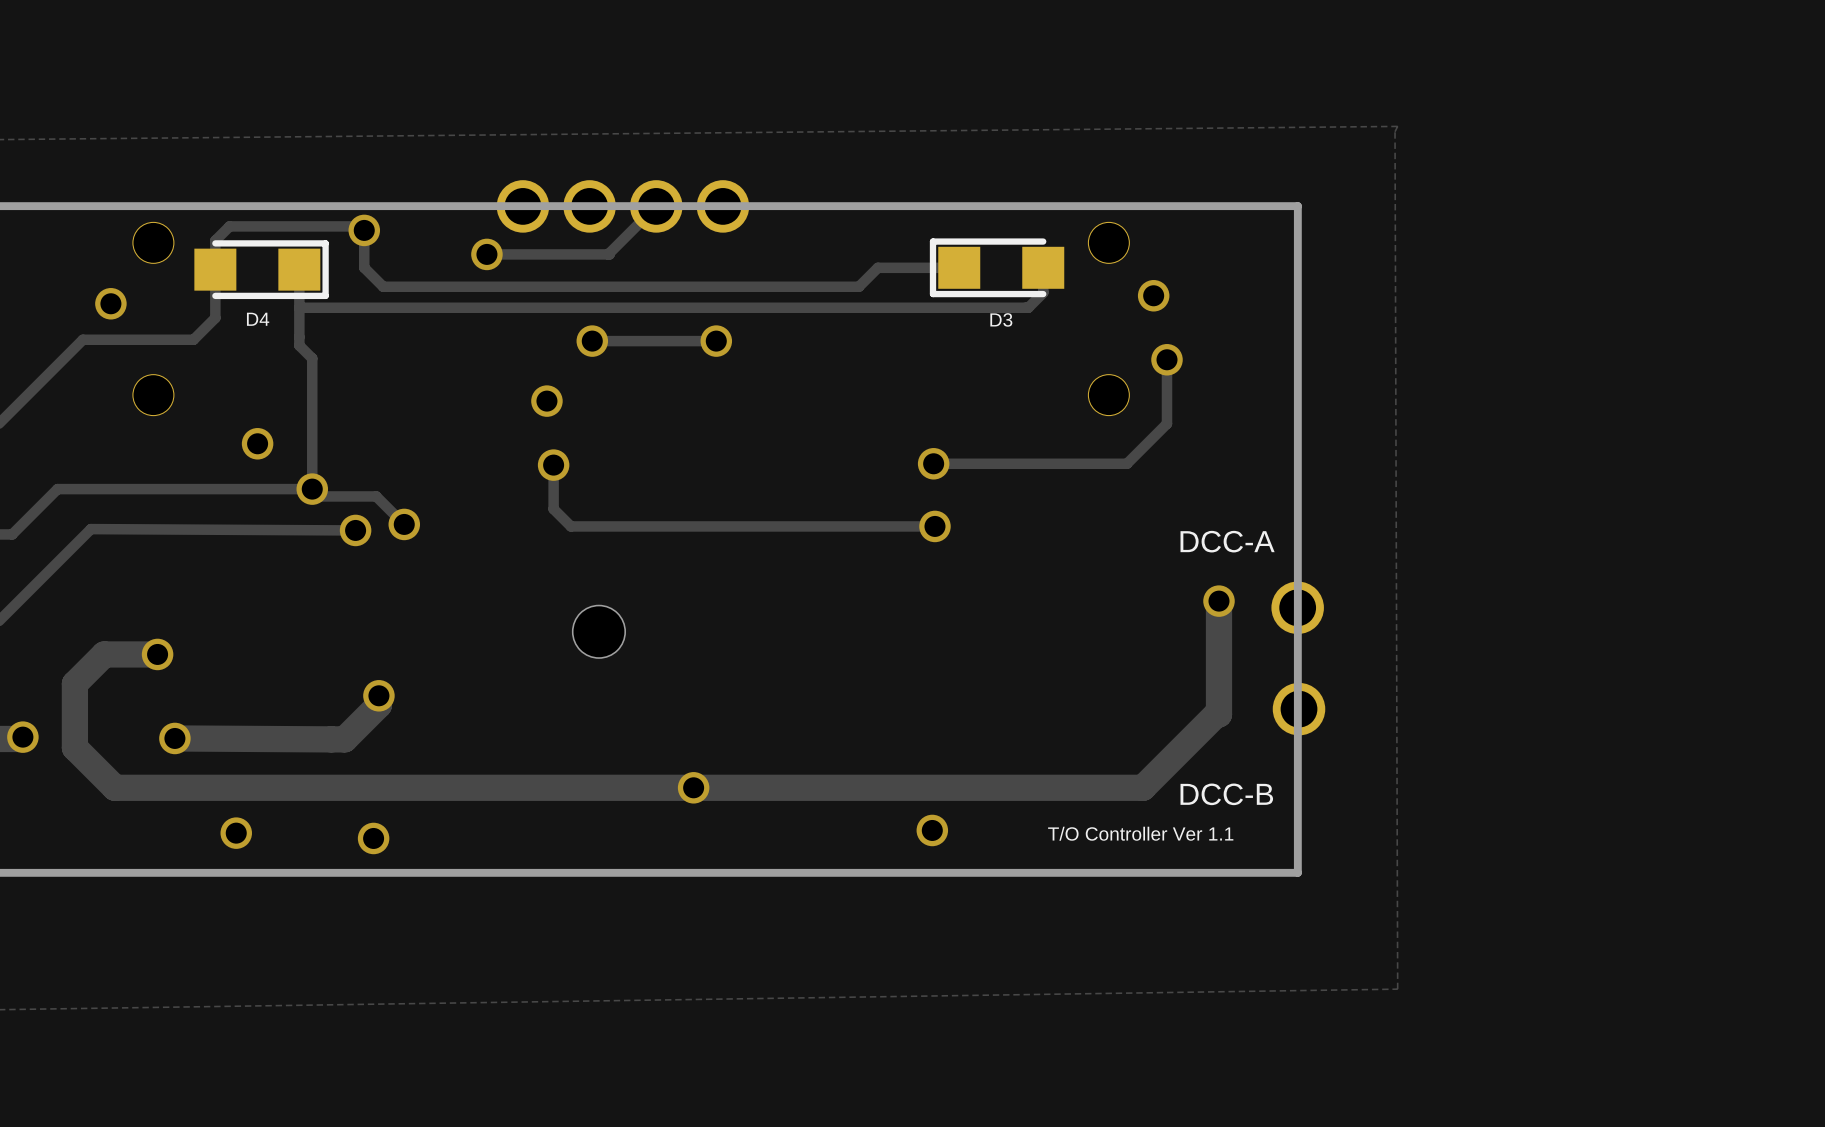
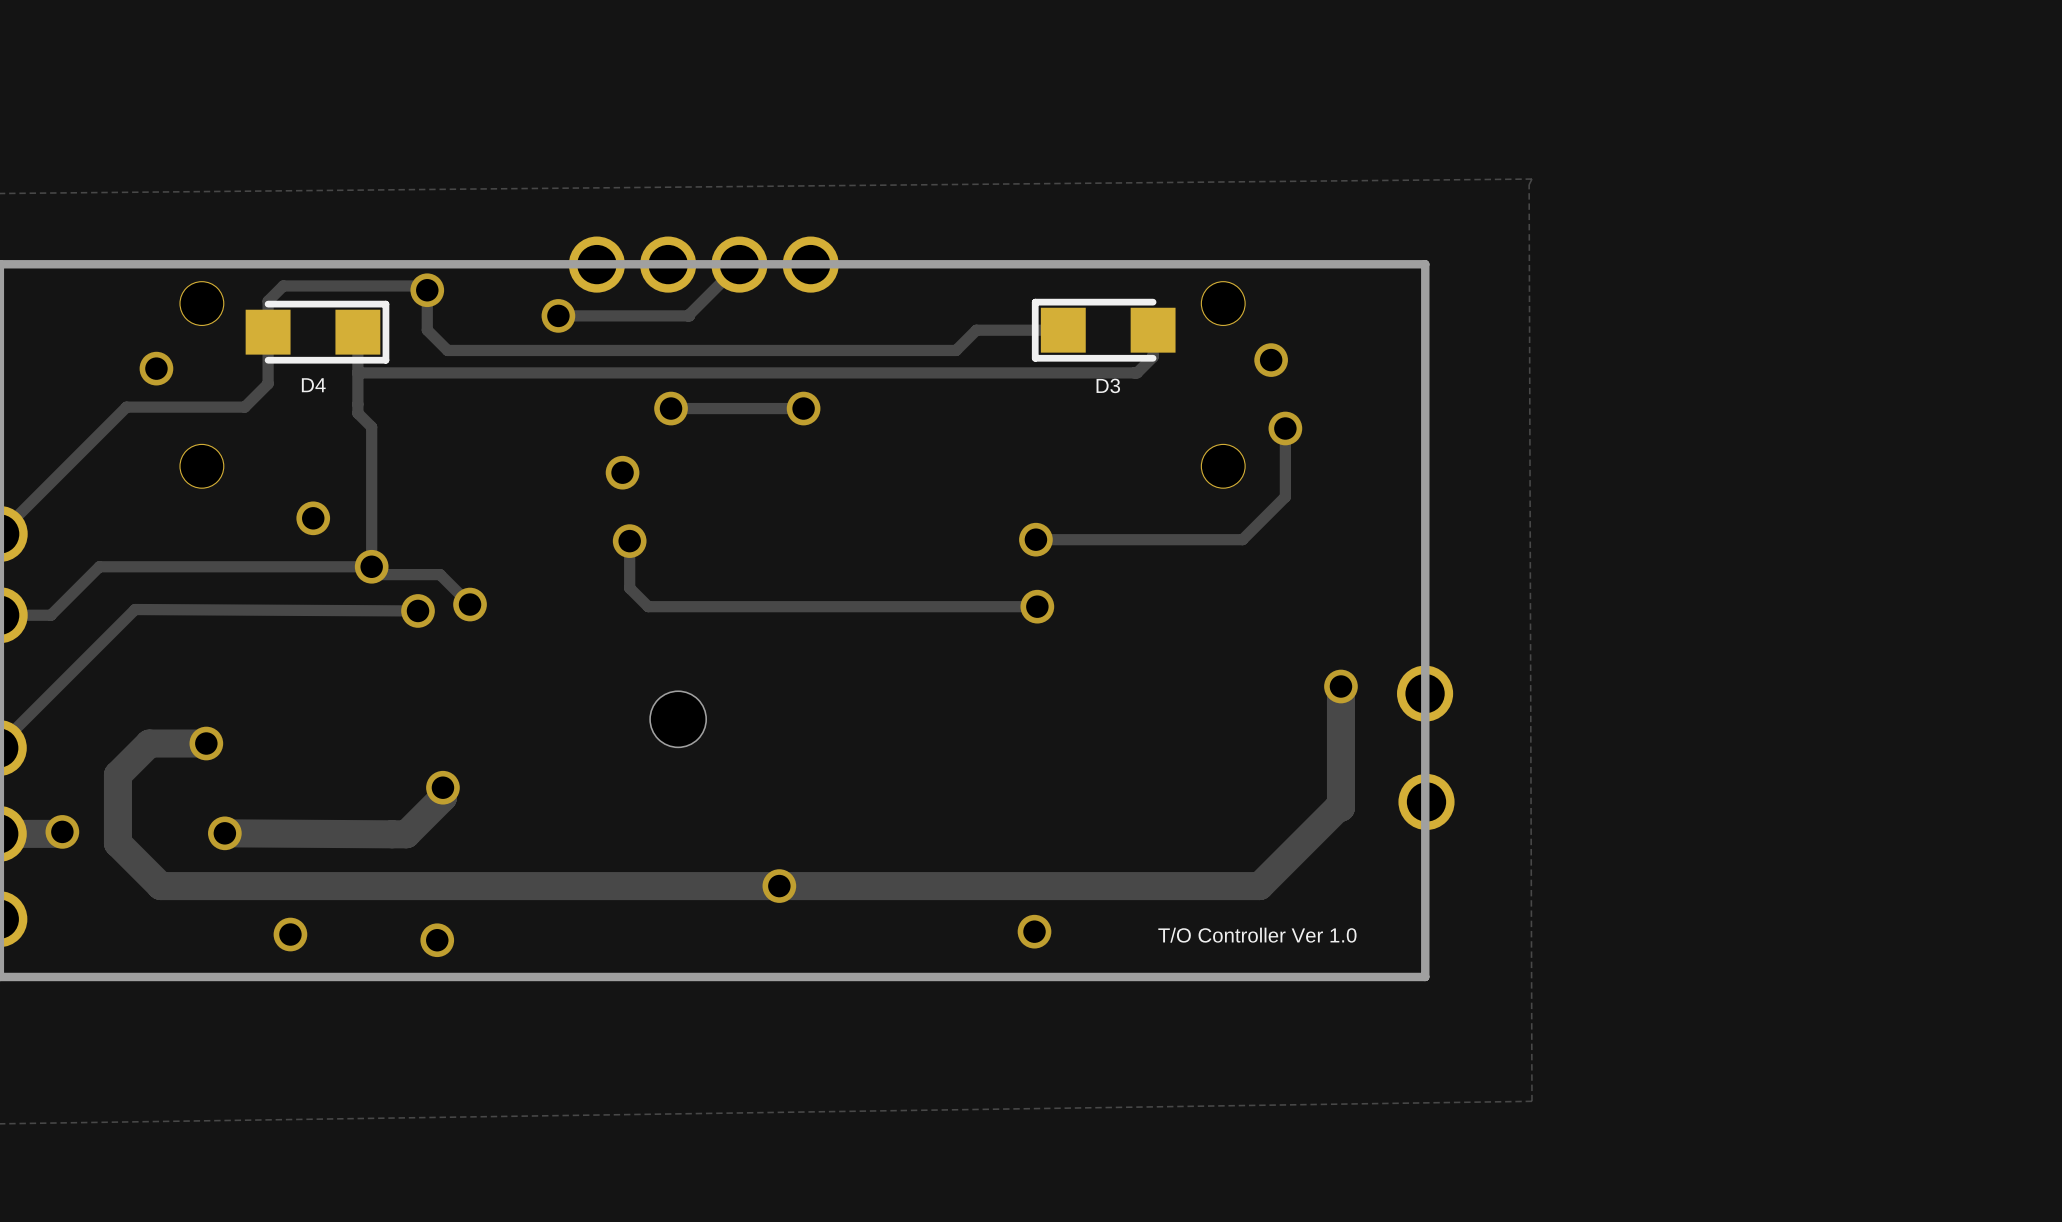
text: DCC-A (1227, 541) -> none
text: DCC-B (1226, 794) -> none
text: T/O Controller Ver 1.1 (1140, 833) -> T/O Controller Ver 1.0 (1257, 935)

